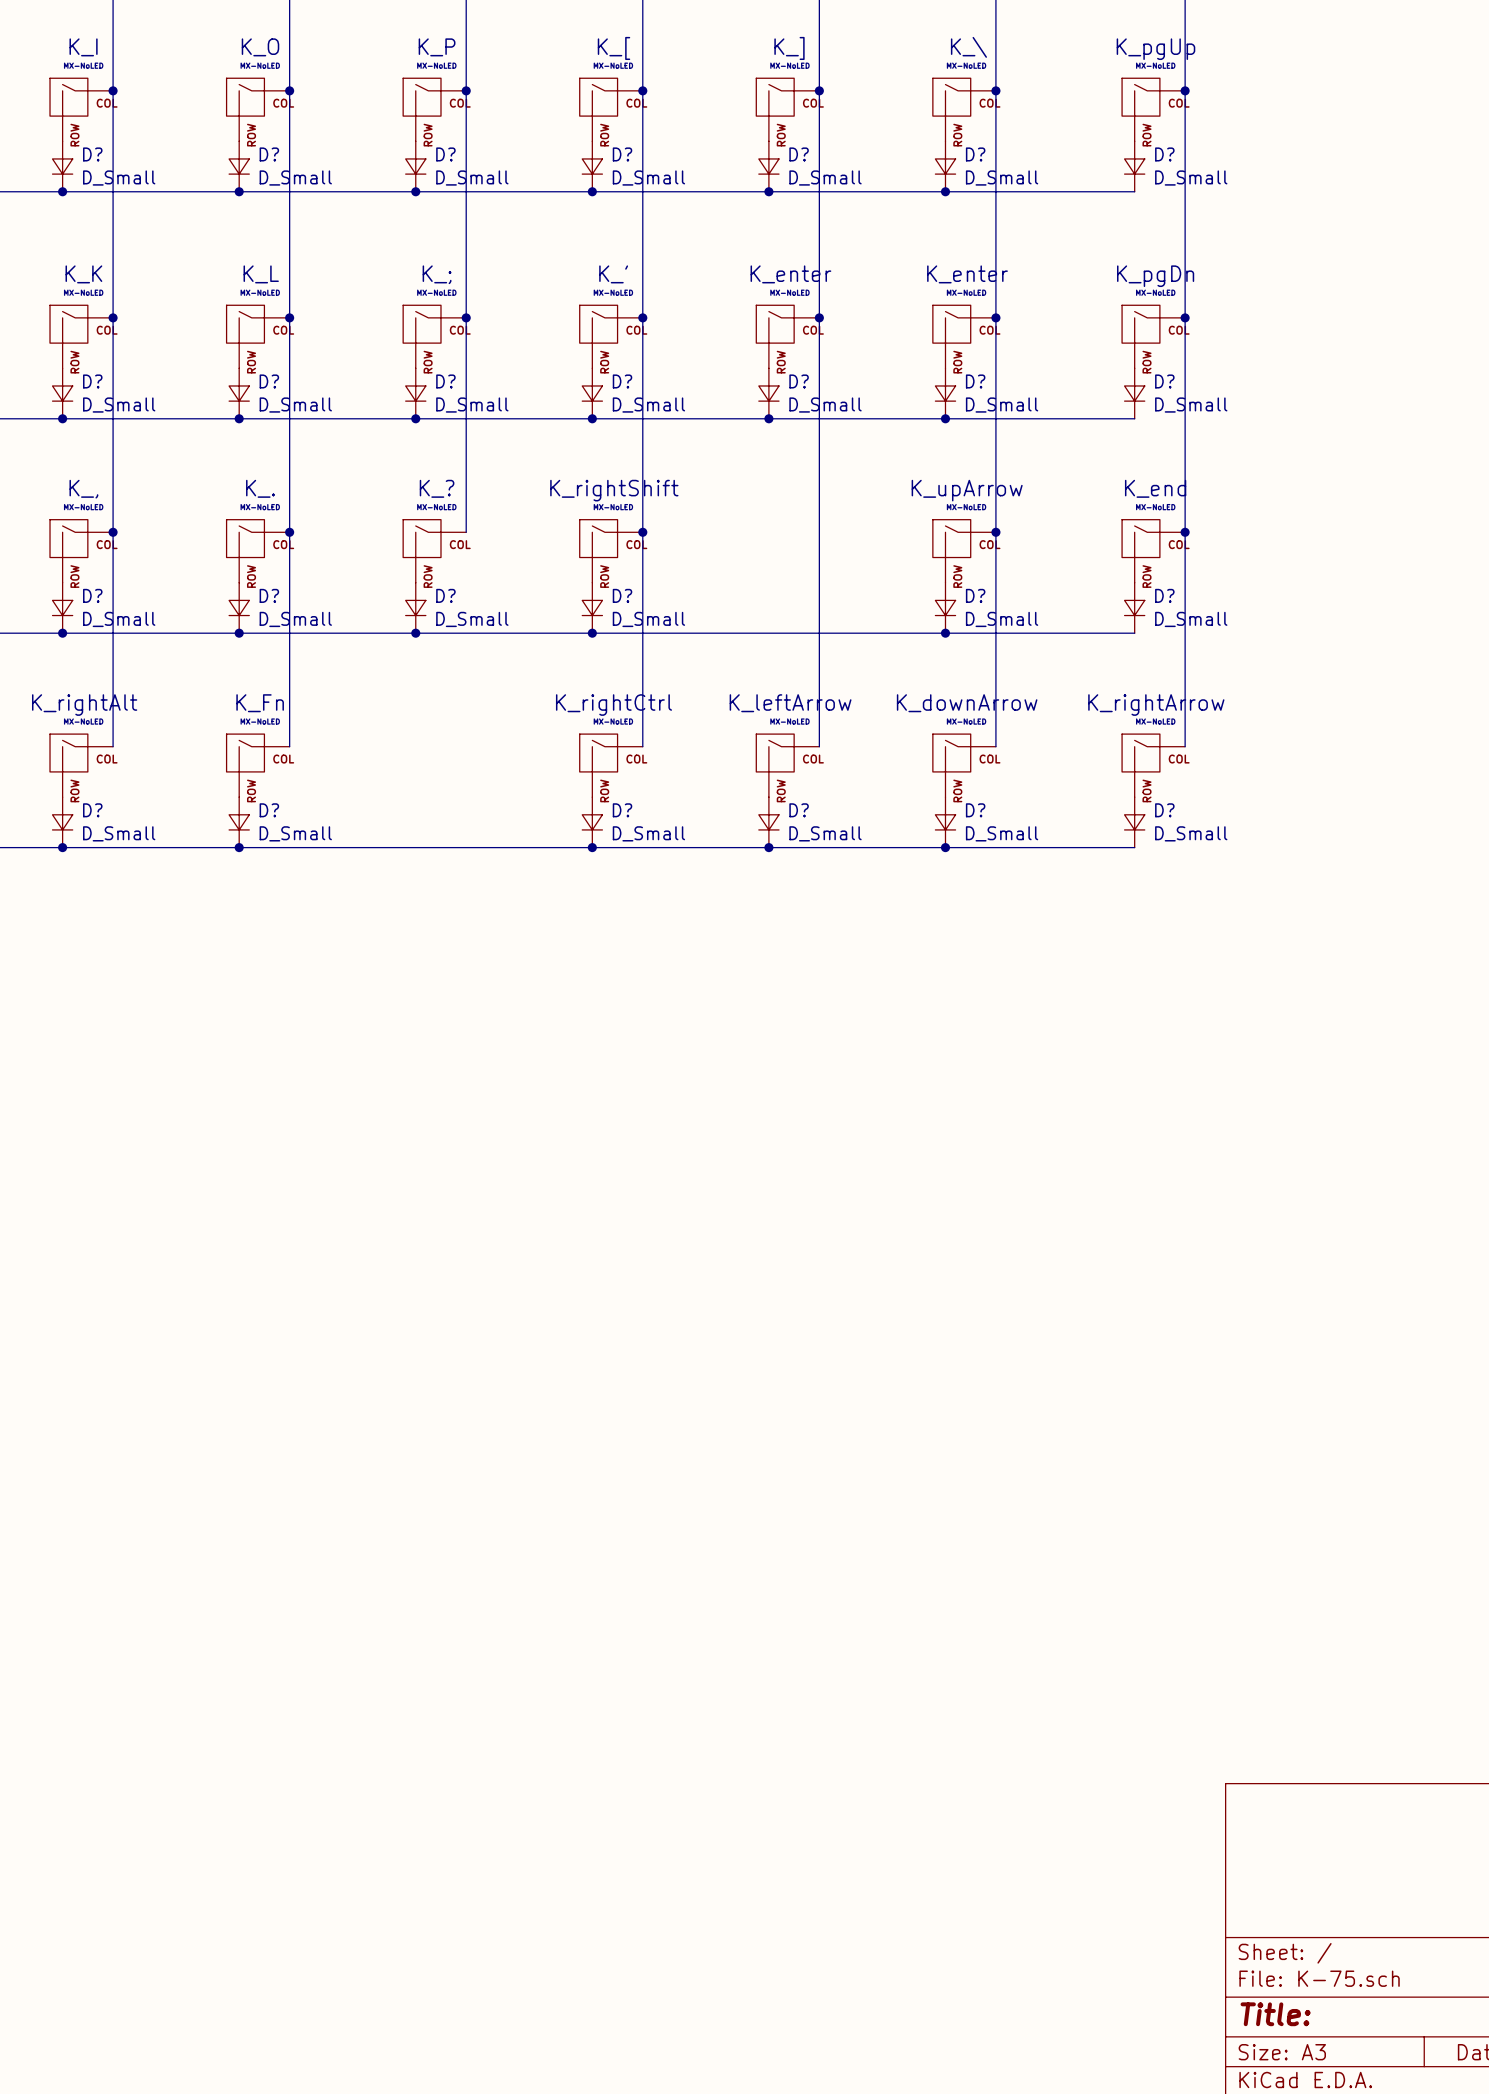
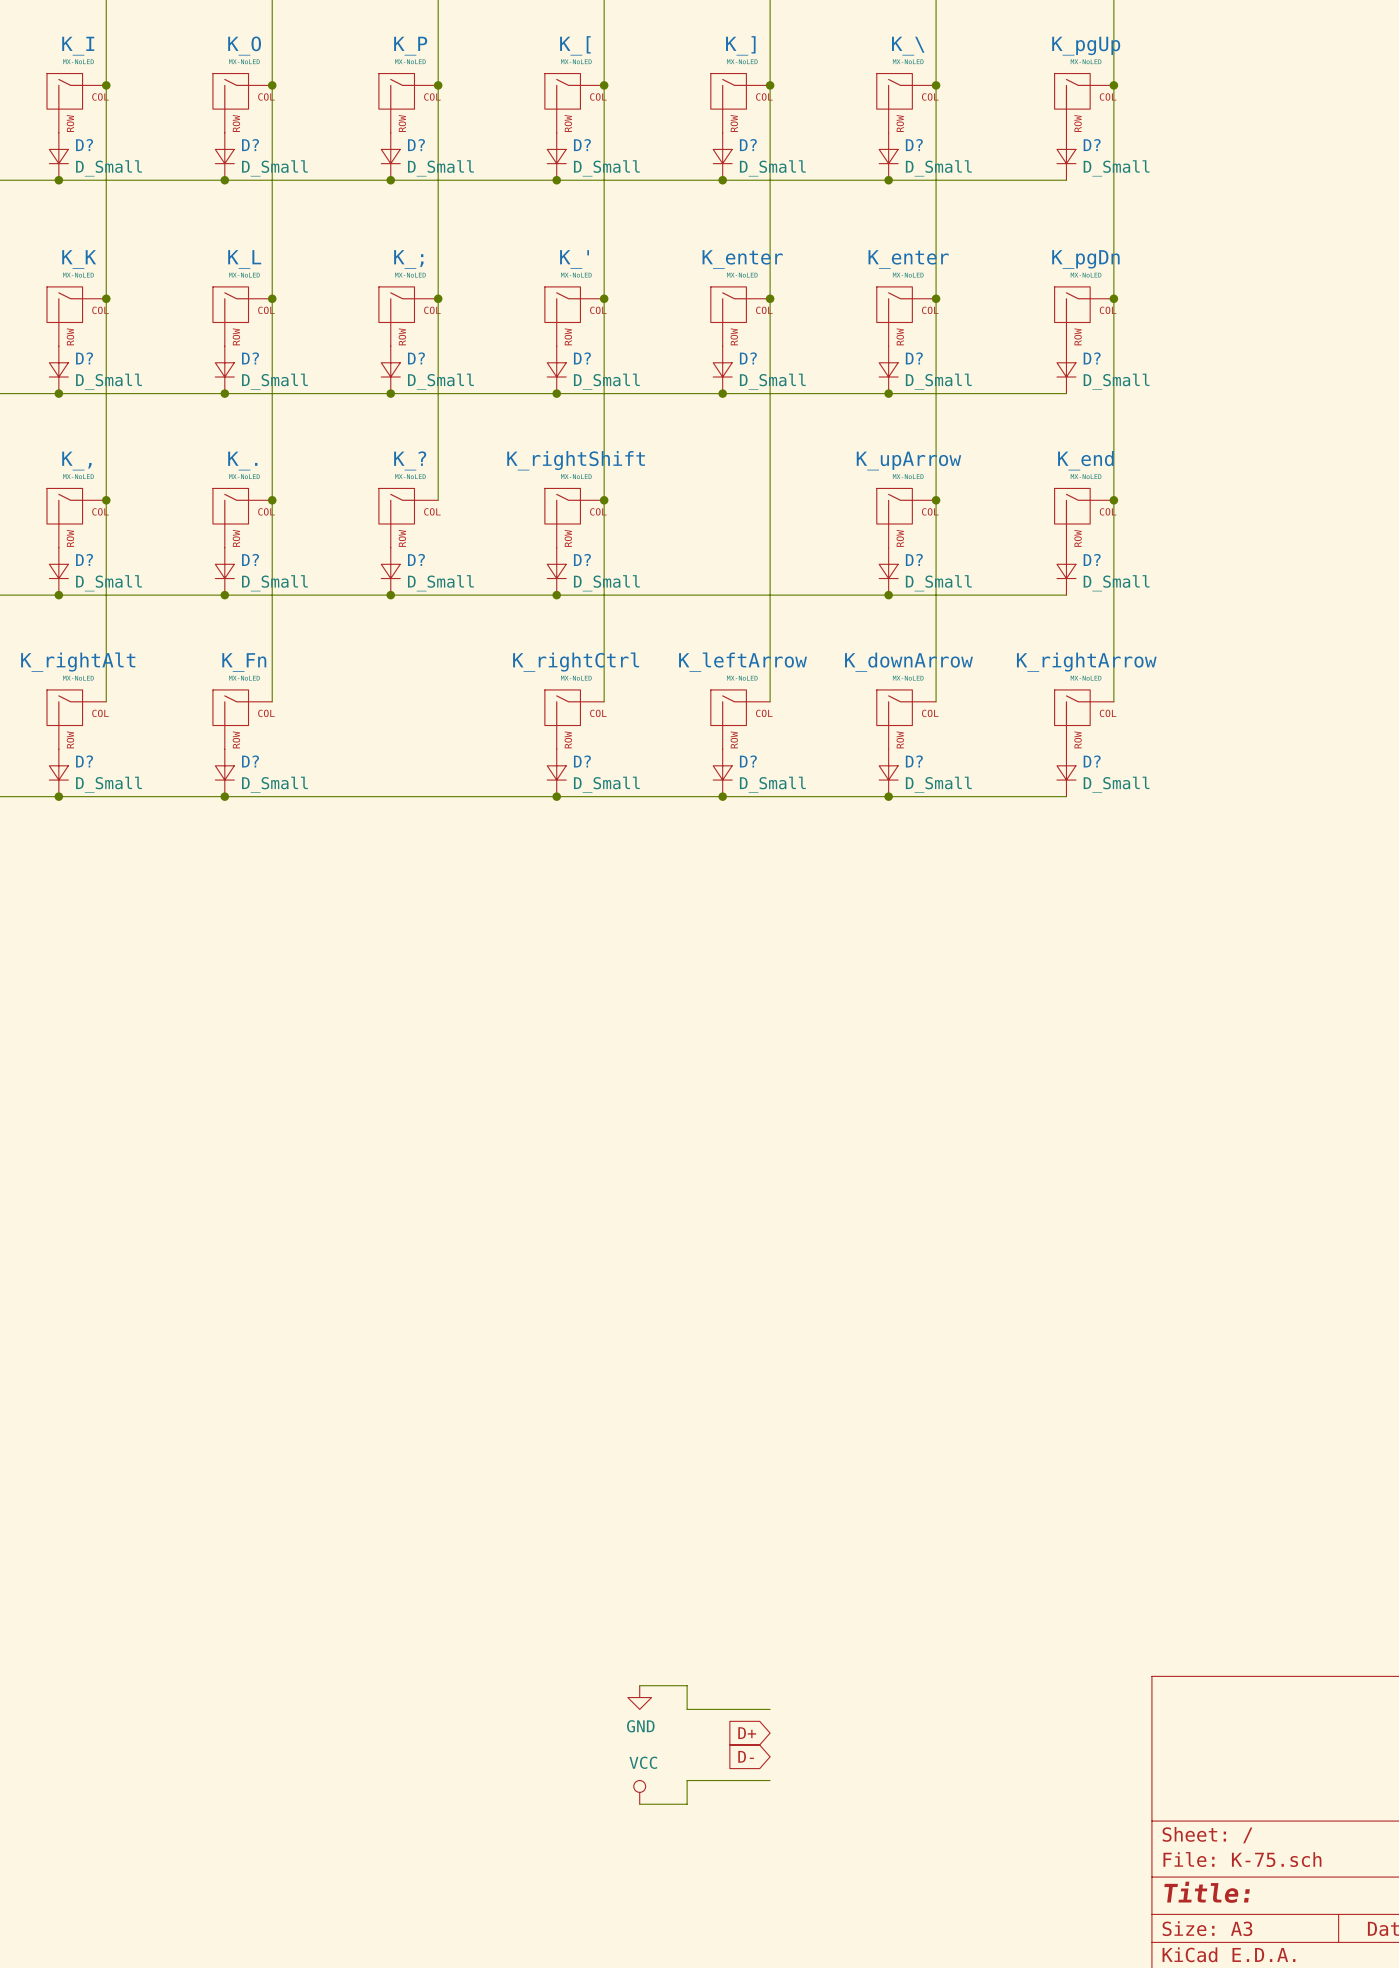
wire: none -> (639, 1685) (687, 1685) (687, 1709) (770, 1709)
power symbol: none -> GND (639, 1697)
global label: none -> D+ (747, 1733)
global label: none -> D- (746, 1756)
wire: none -> (770, 1780) (687, 1780) (687, 1804) (639, 1804)
power symbol: none -> VCC (639, 1792)

